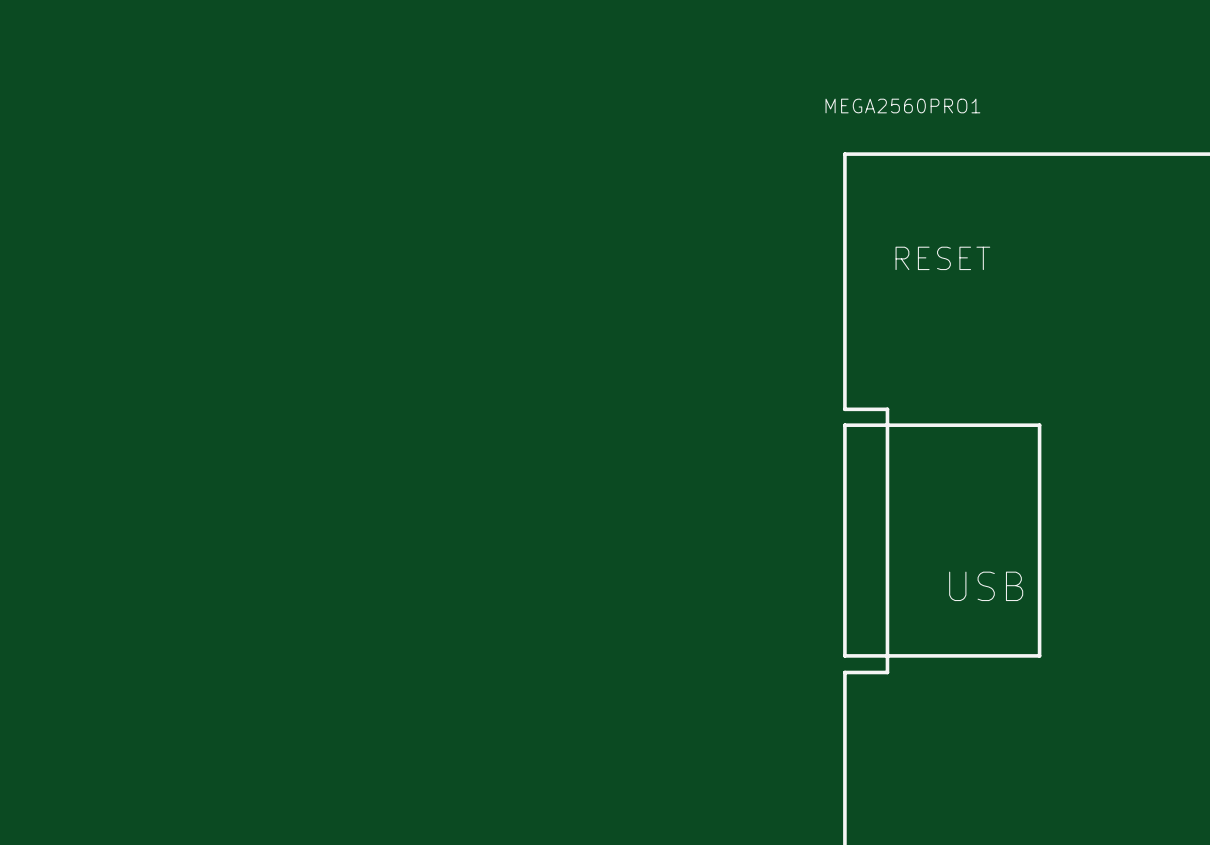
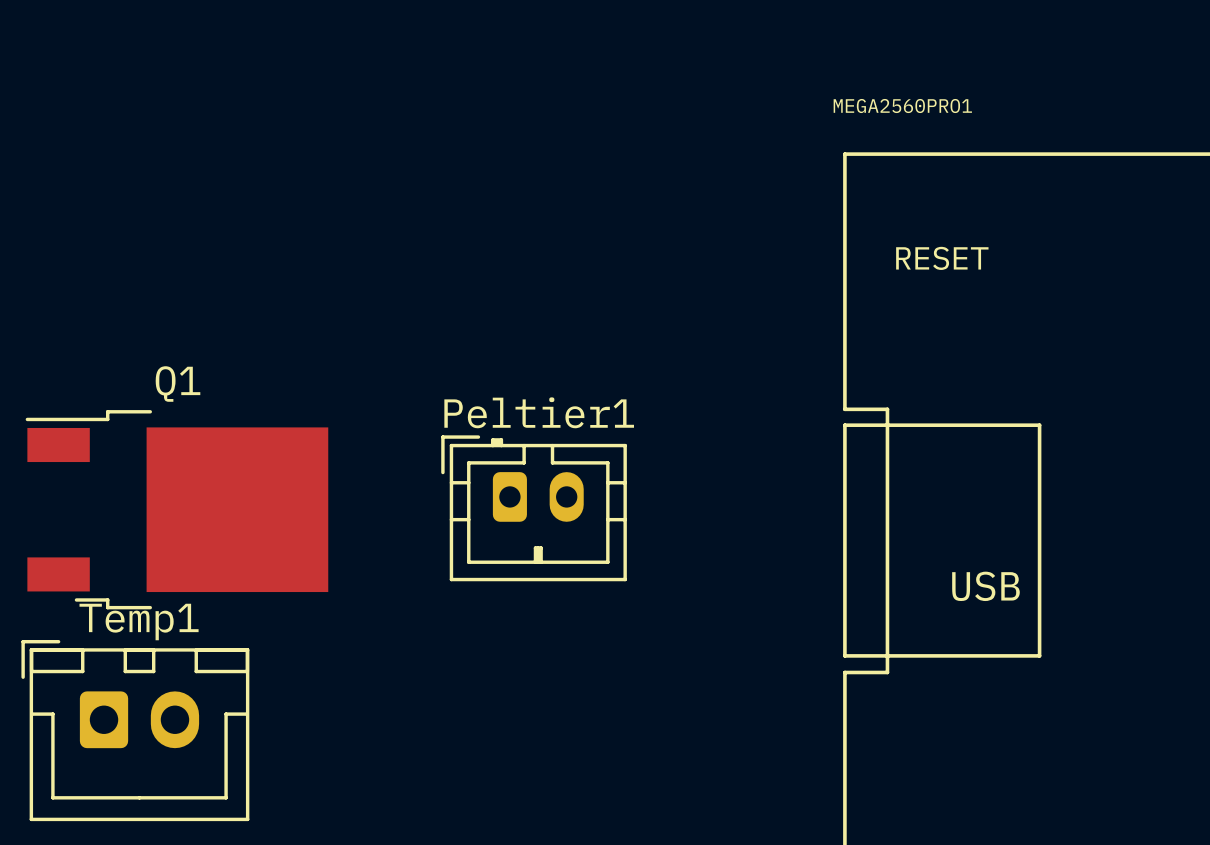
Peltier1: none -> (534, 508)
Q1: none -> (176, 509)
Temp1: none -> (135, 730)

